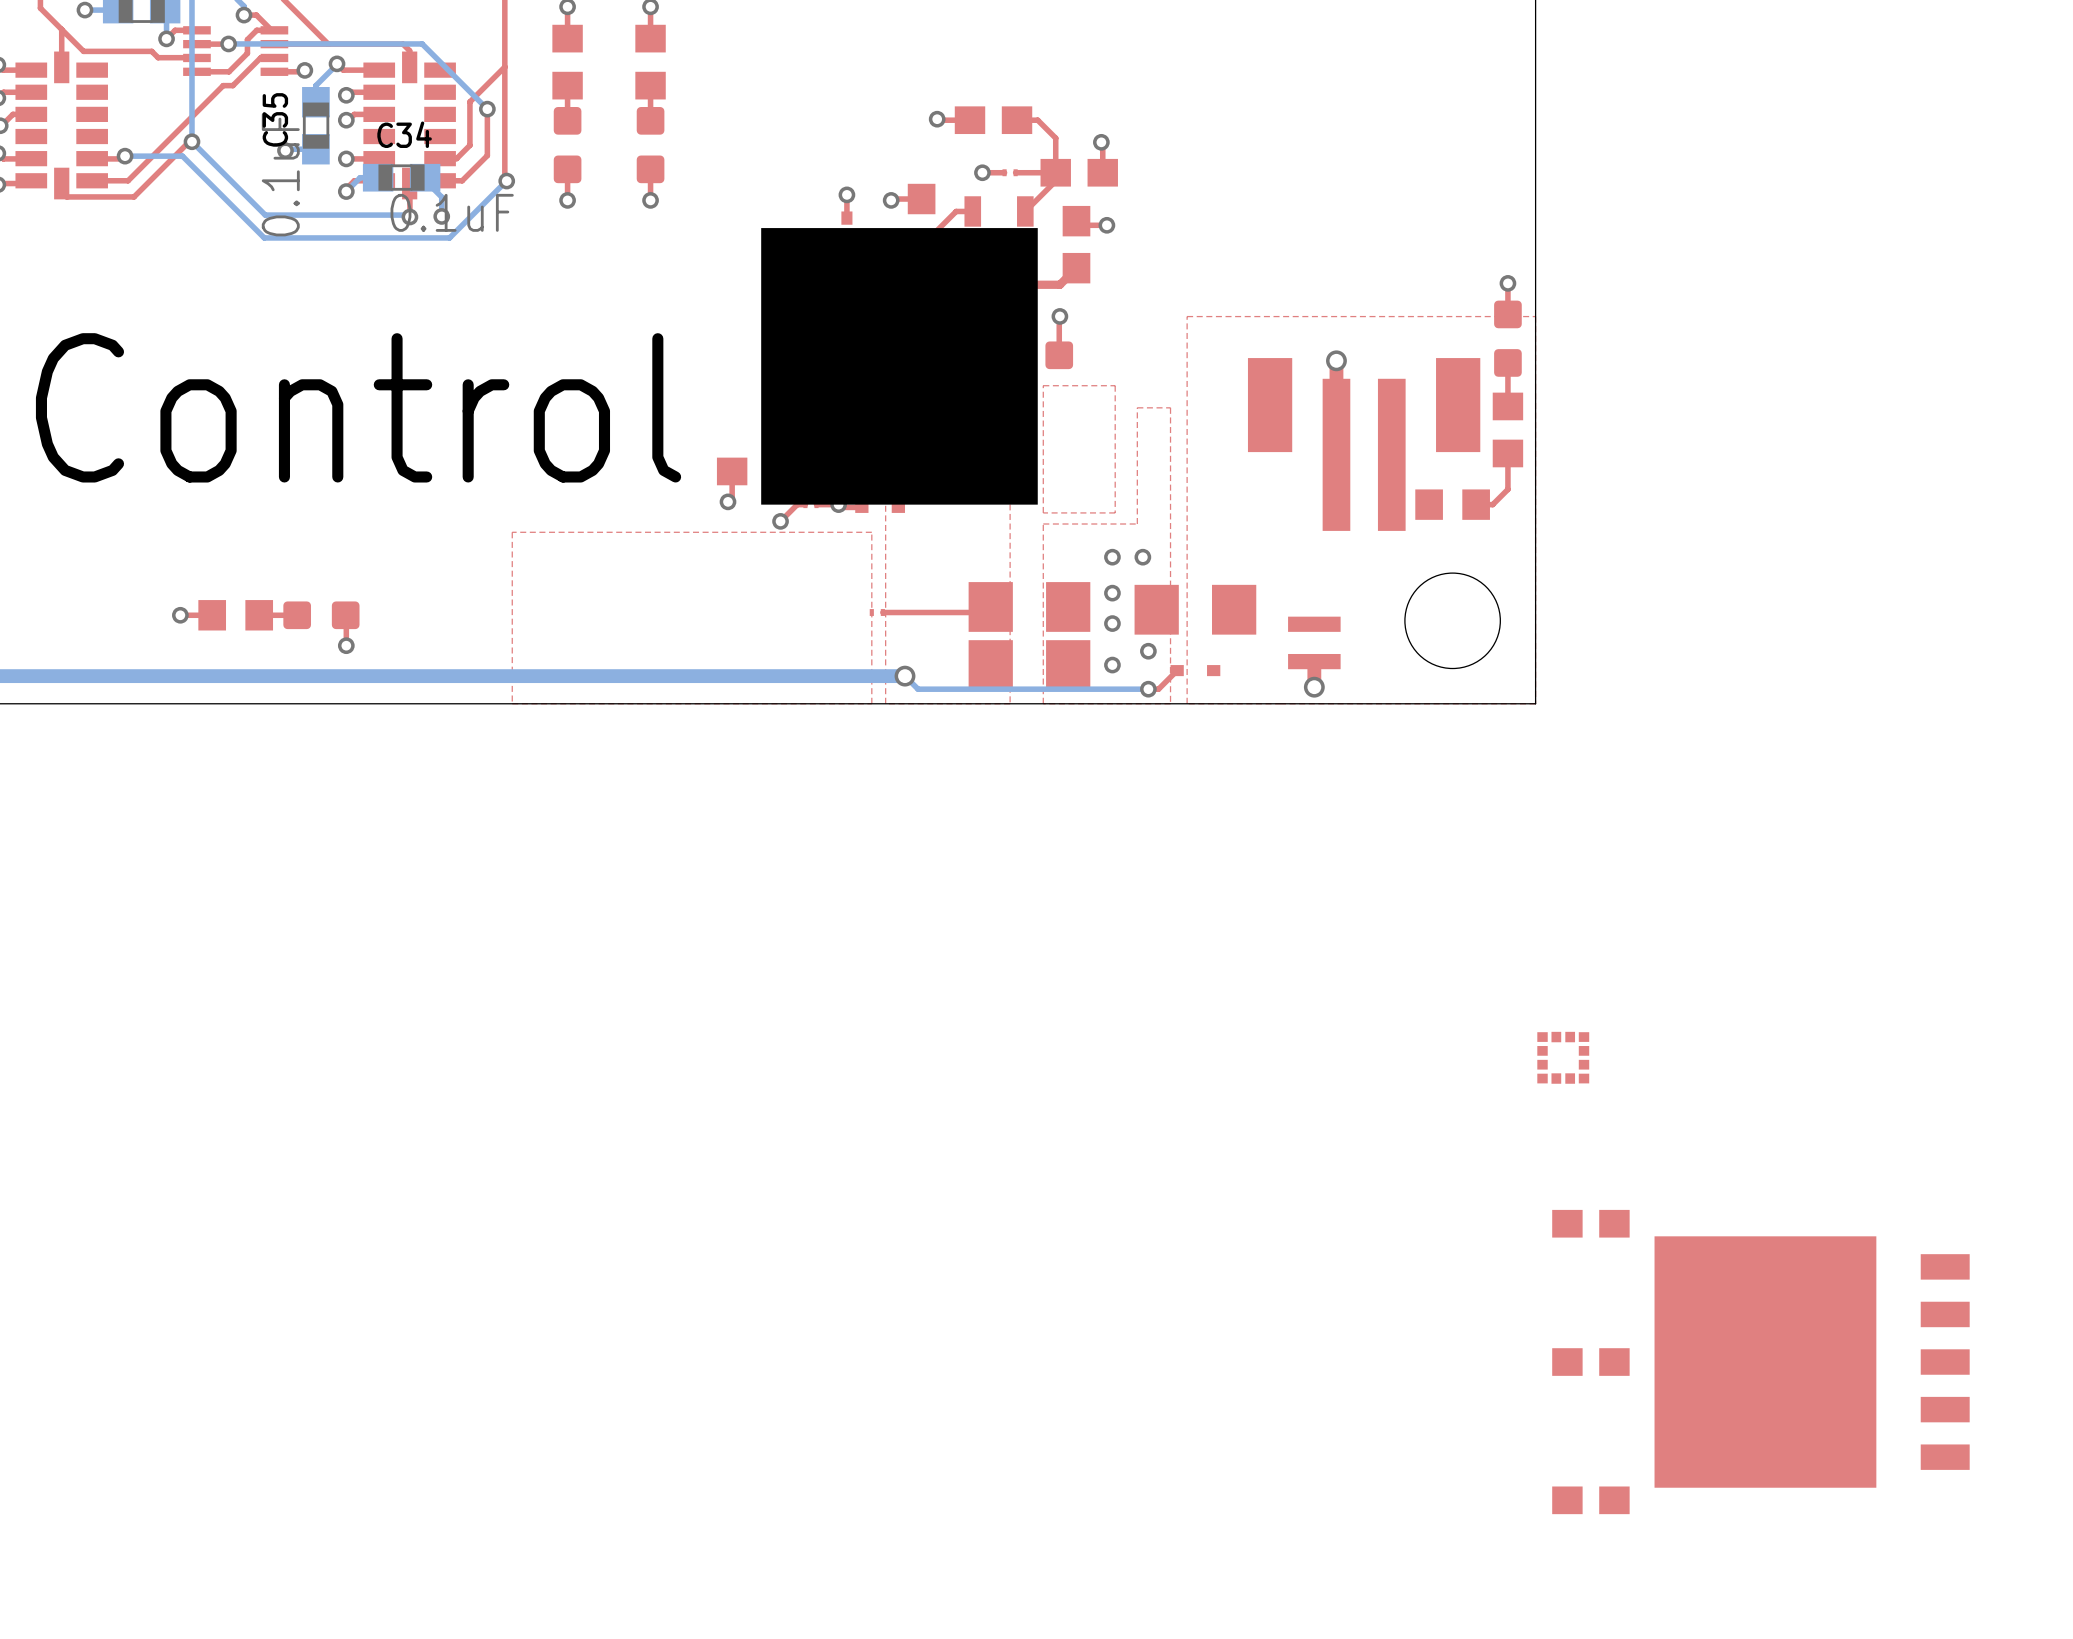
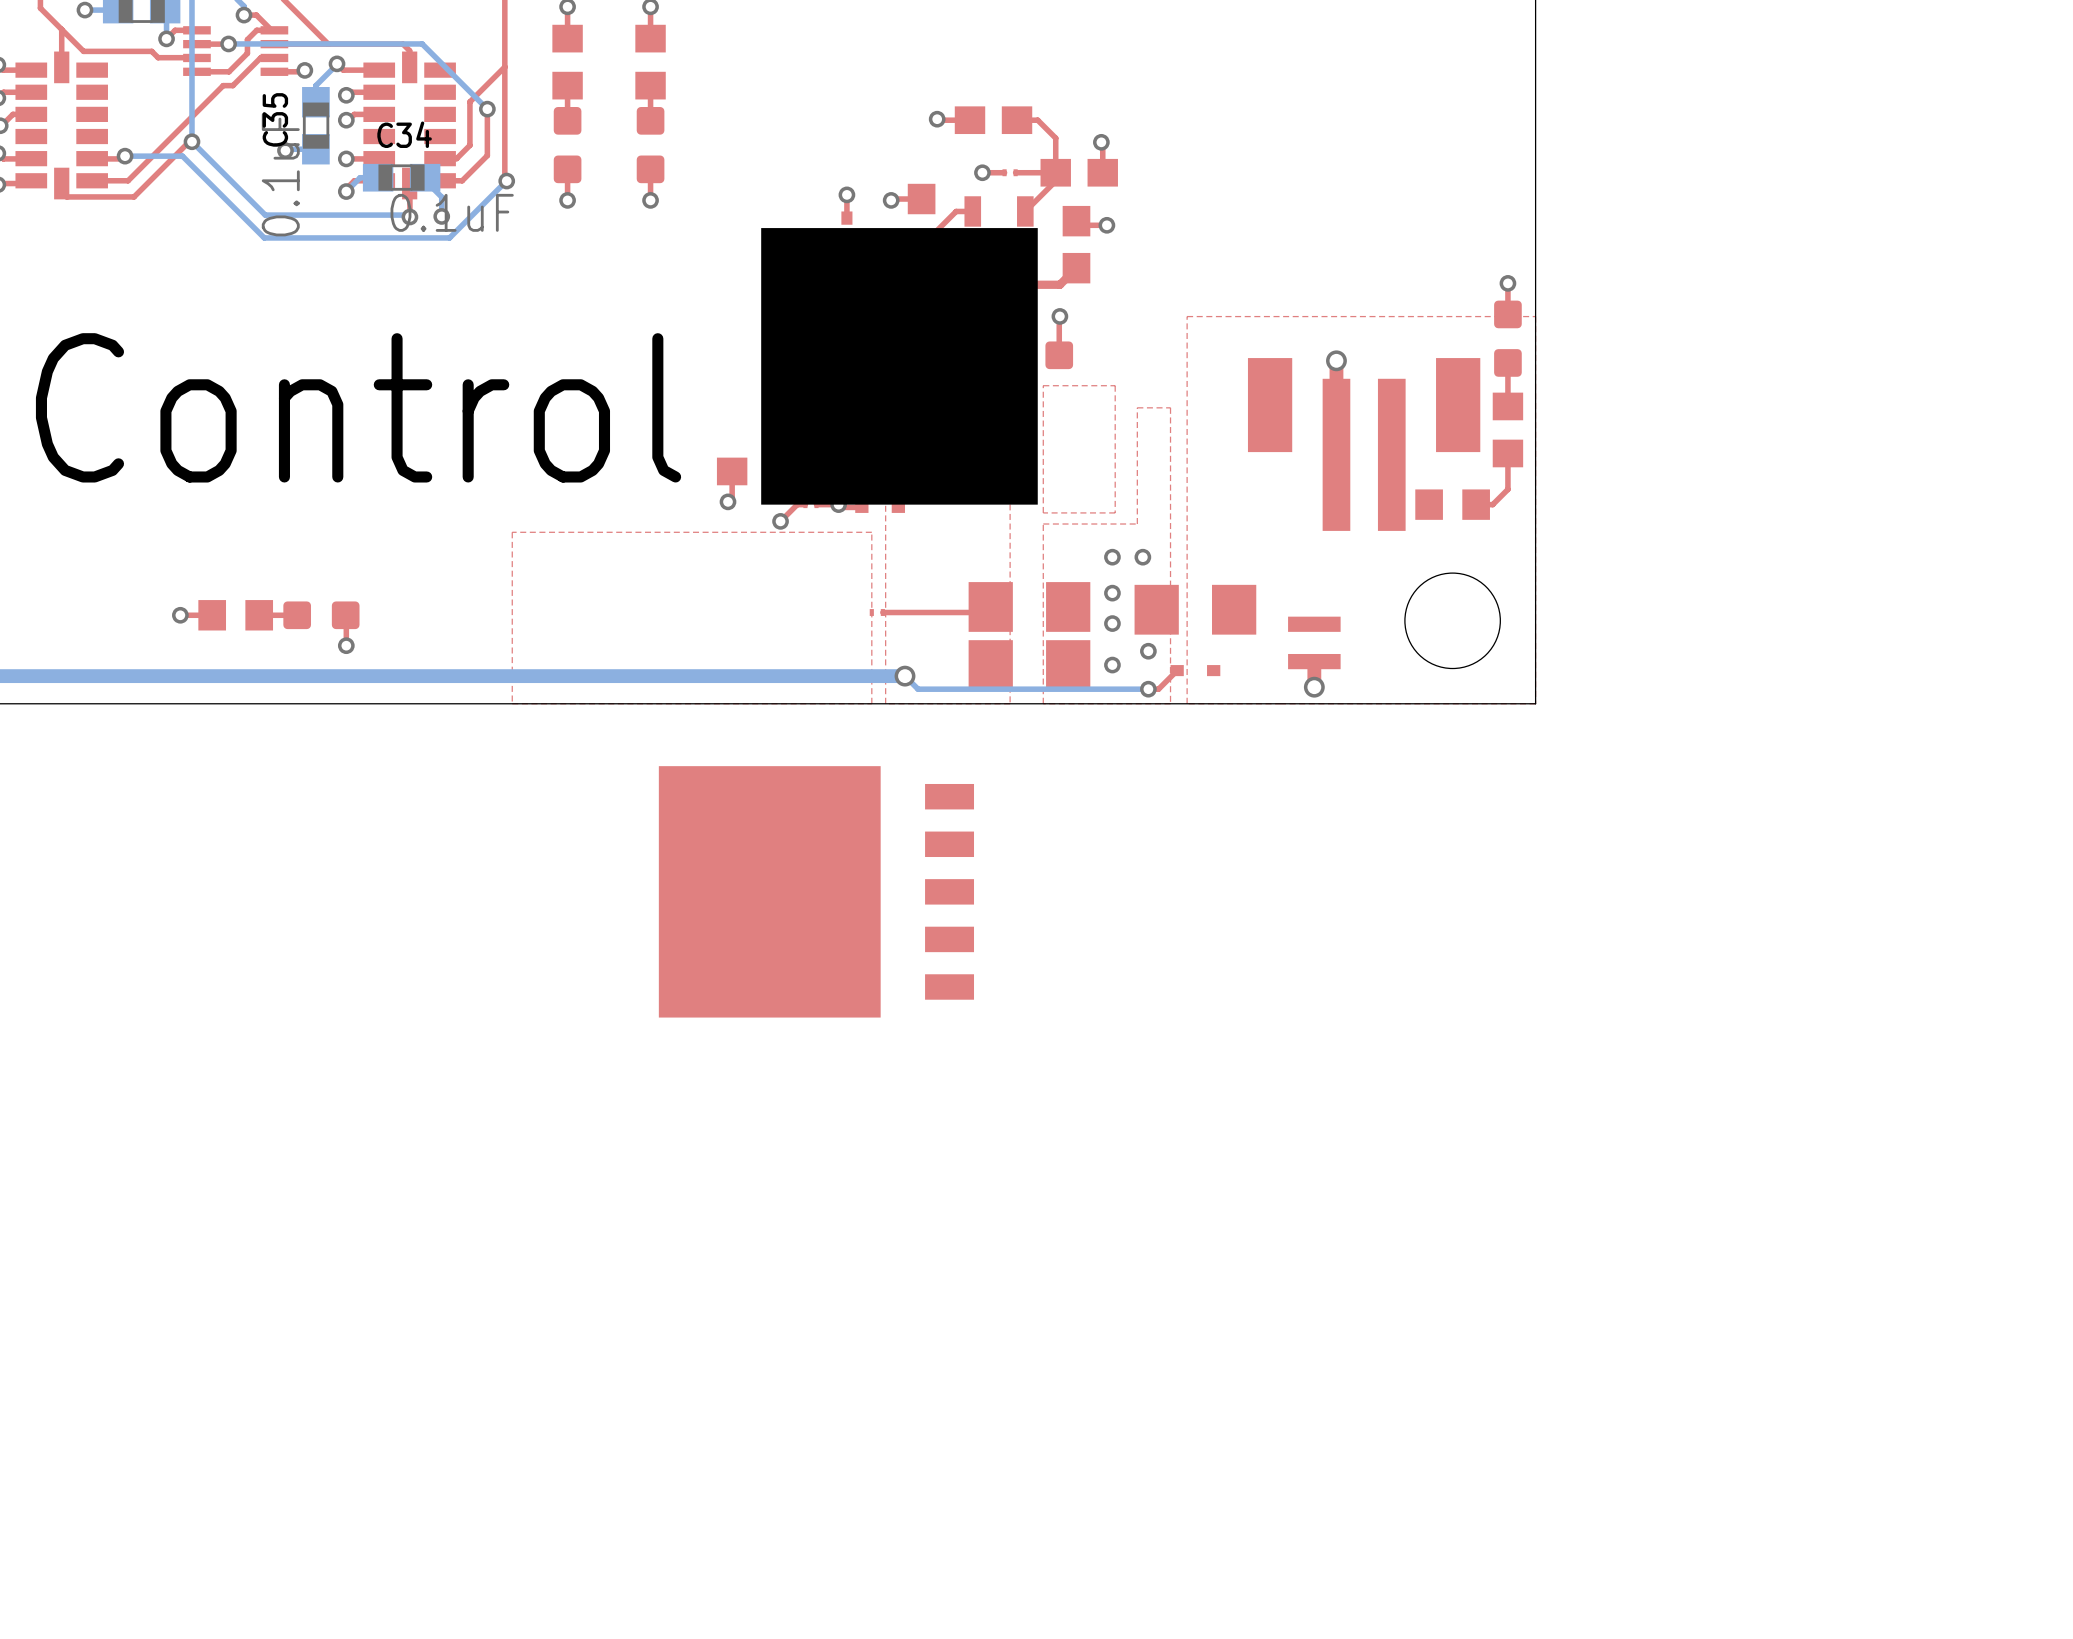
part: none -> (816, 891)
part: (1563, 1057) -> none
part: (1590, 1223) -> none
part: (1590, 1362) -> none
part: (1812, 1362) -> none
part: (1590, 1500) -> none

